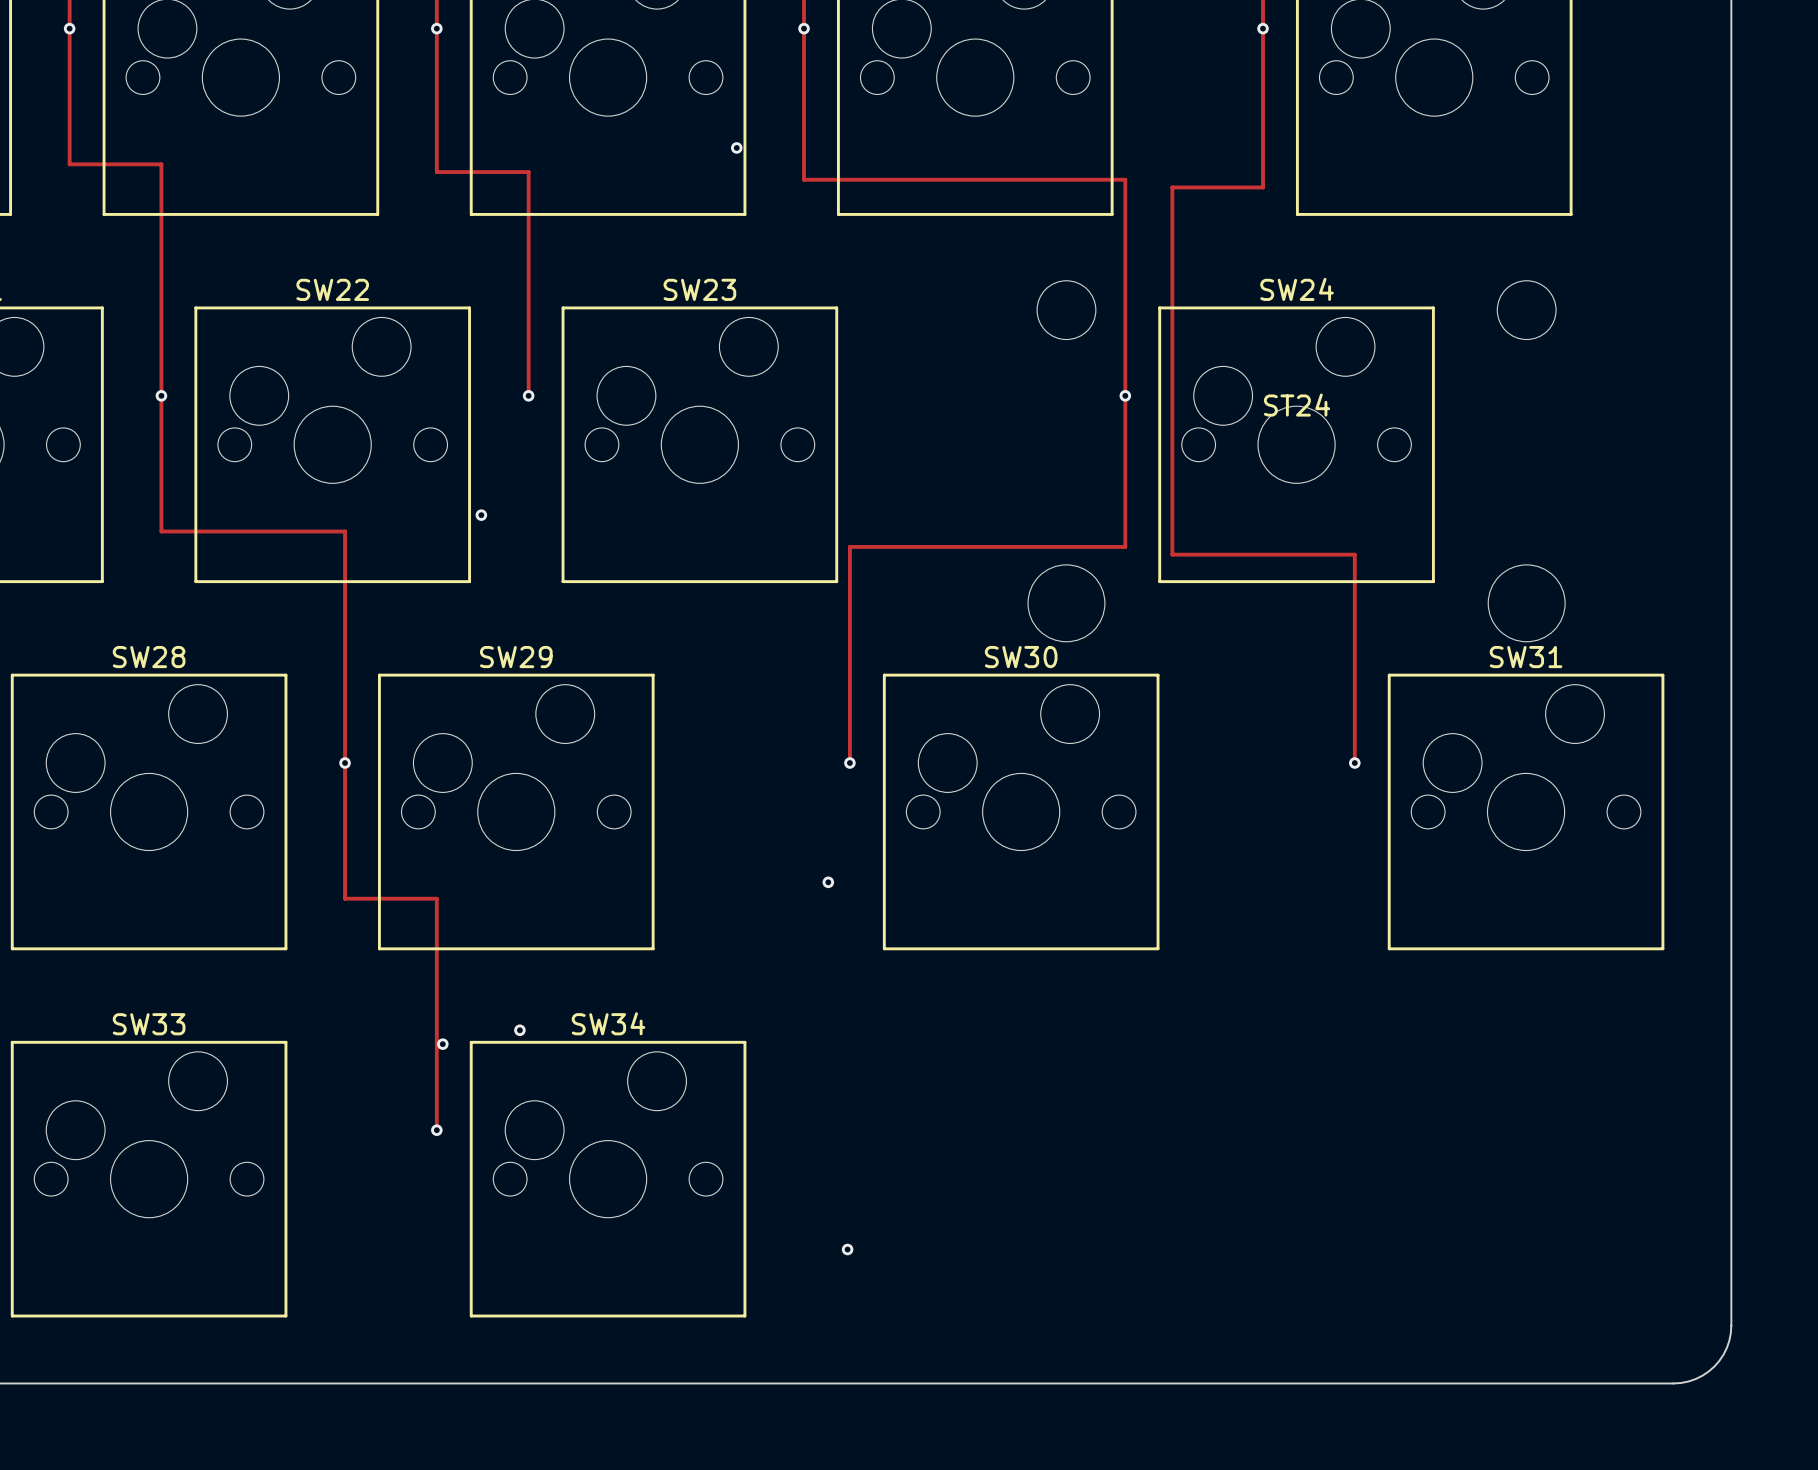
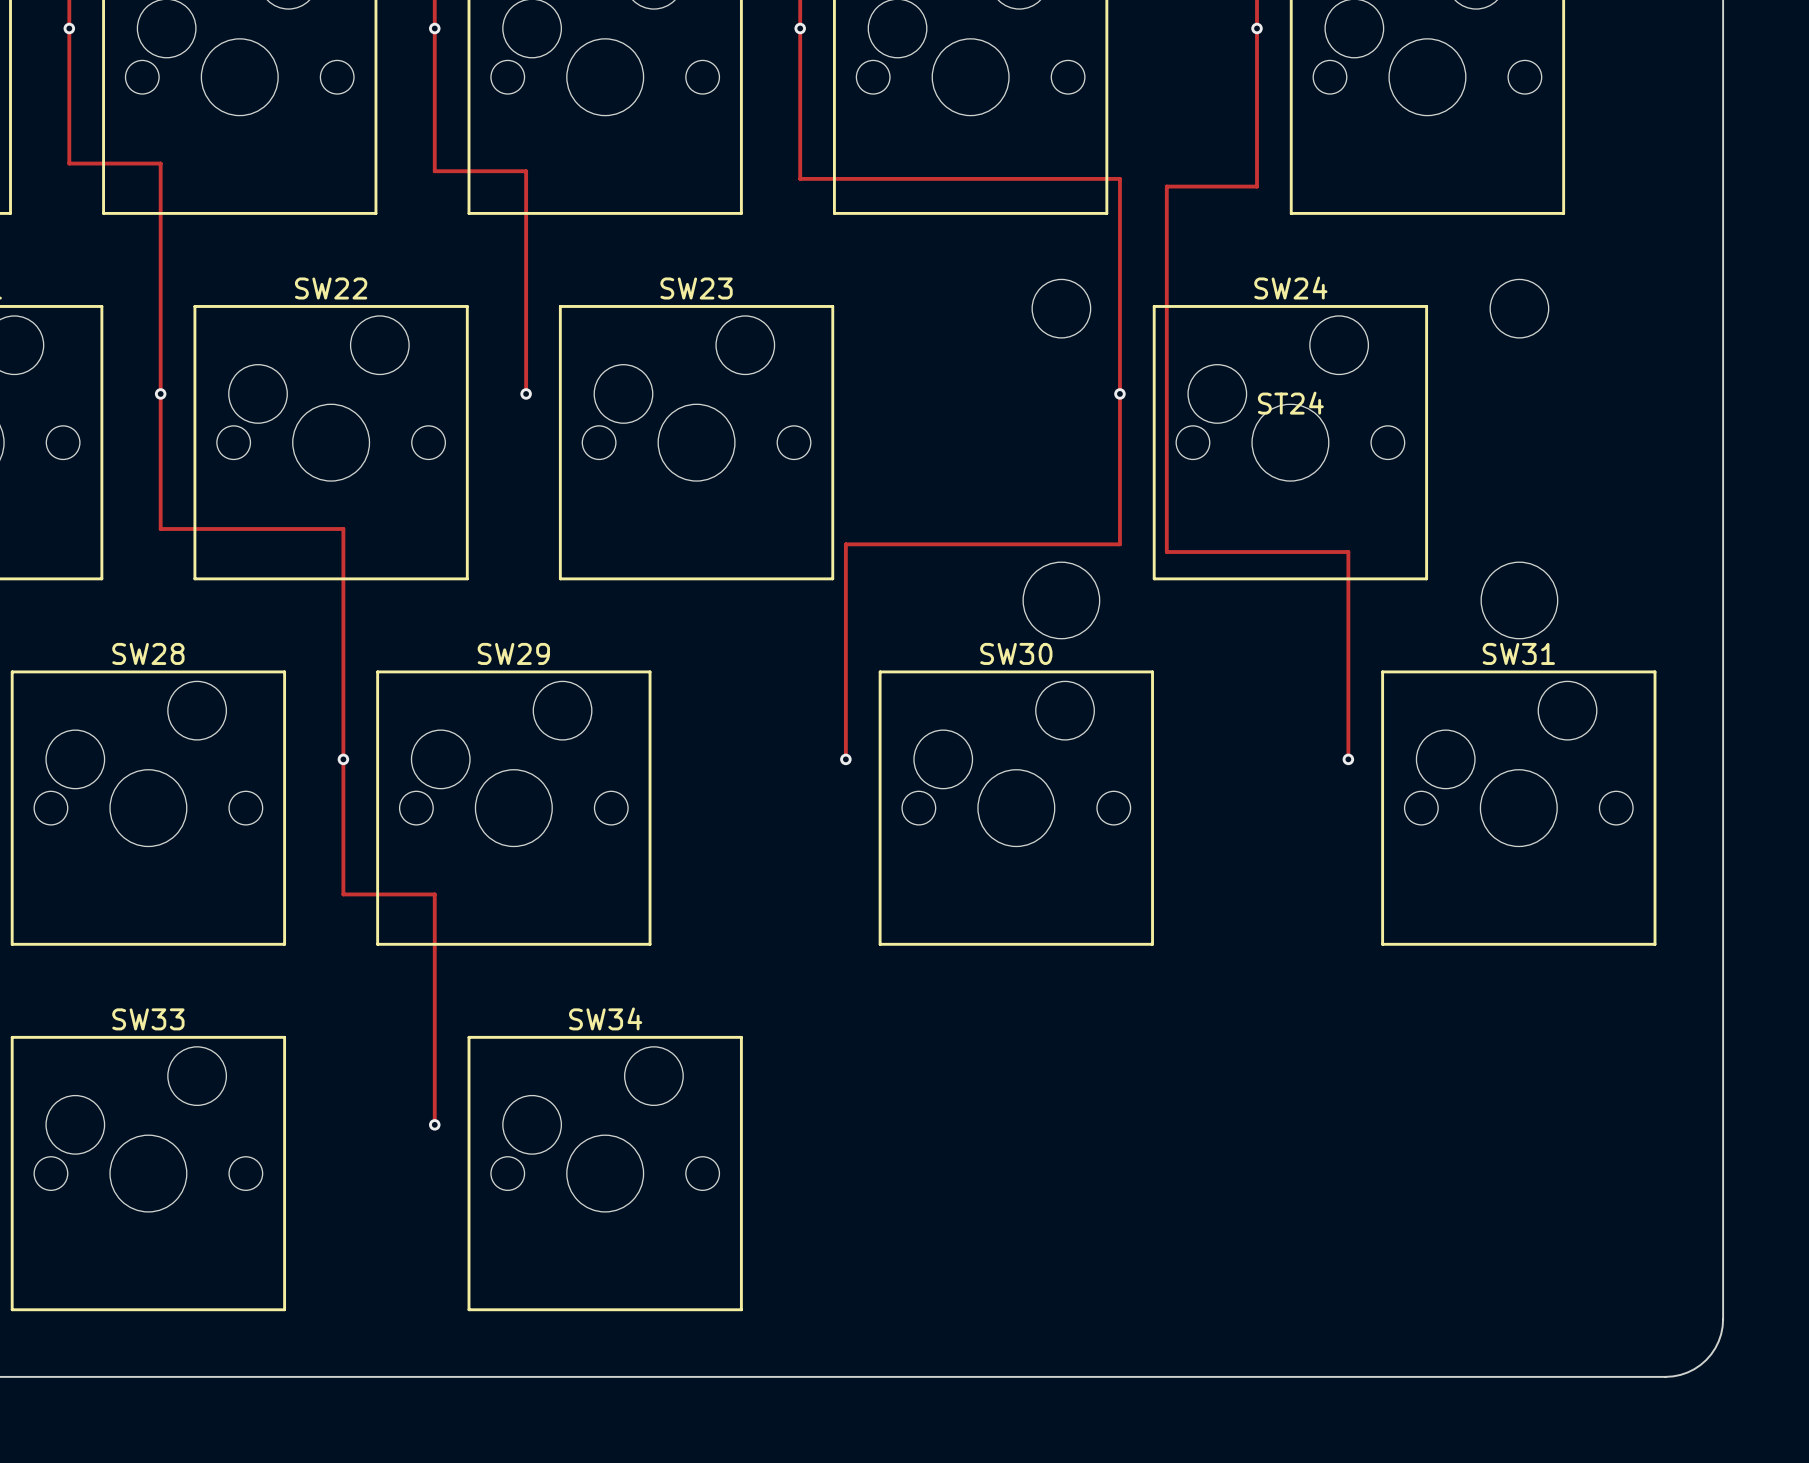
via: (736, 147) -> none
via: (481, 515) -> none
via: (828, 882) -> none
via: (519, 1030) -> none
via: (442, 1044) -> none
via: (847, 1249) -> none

